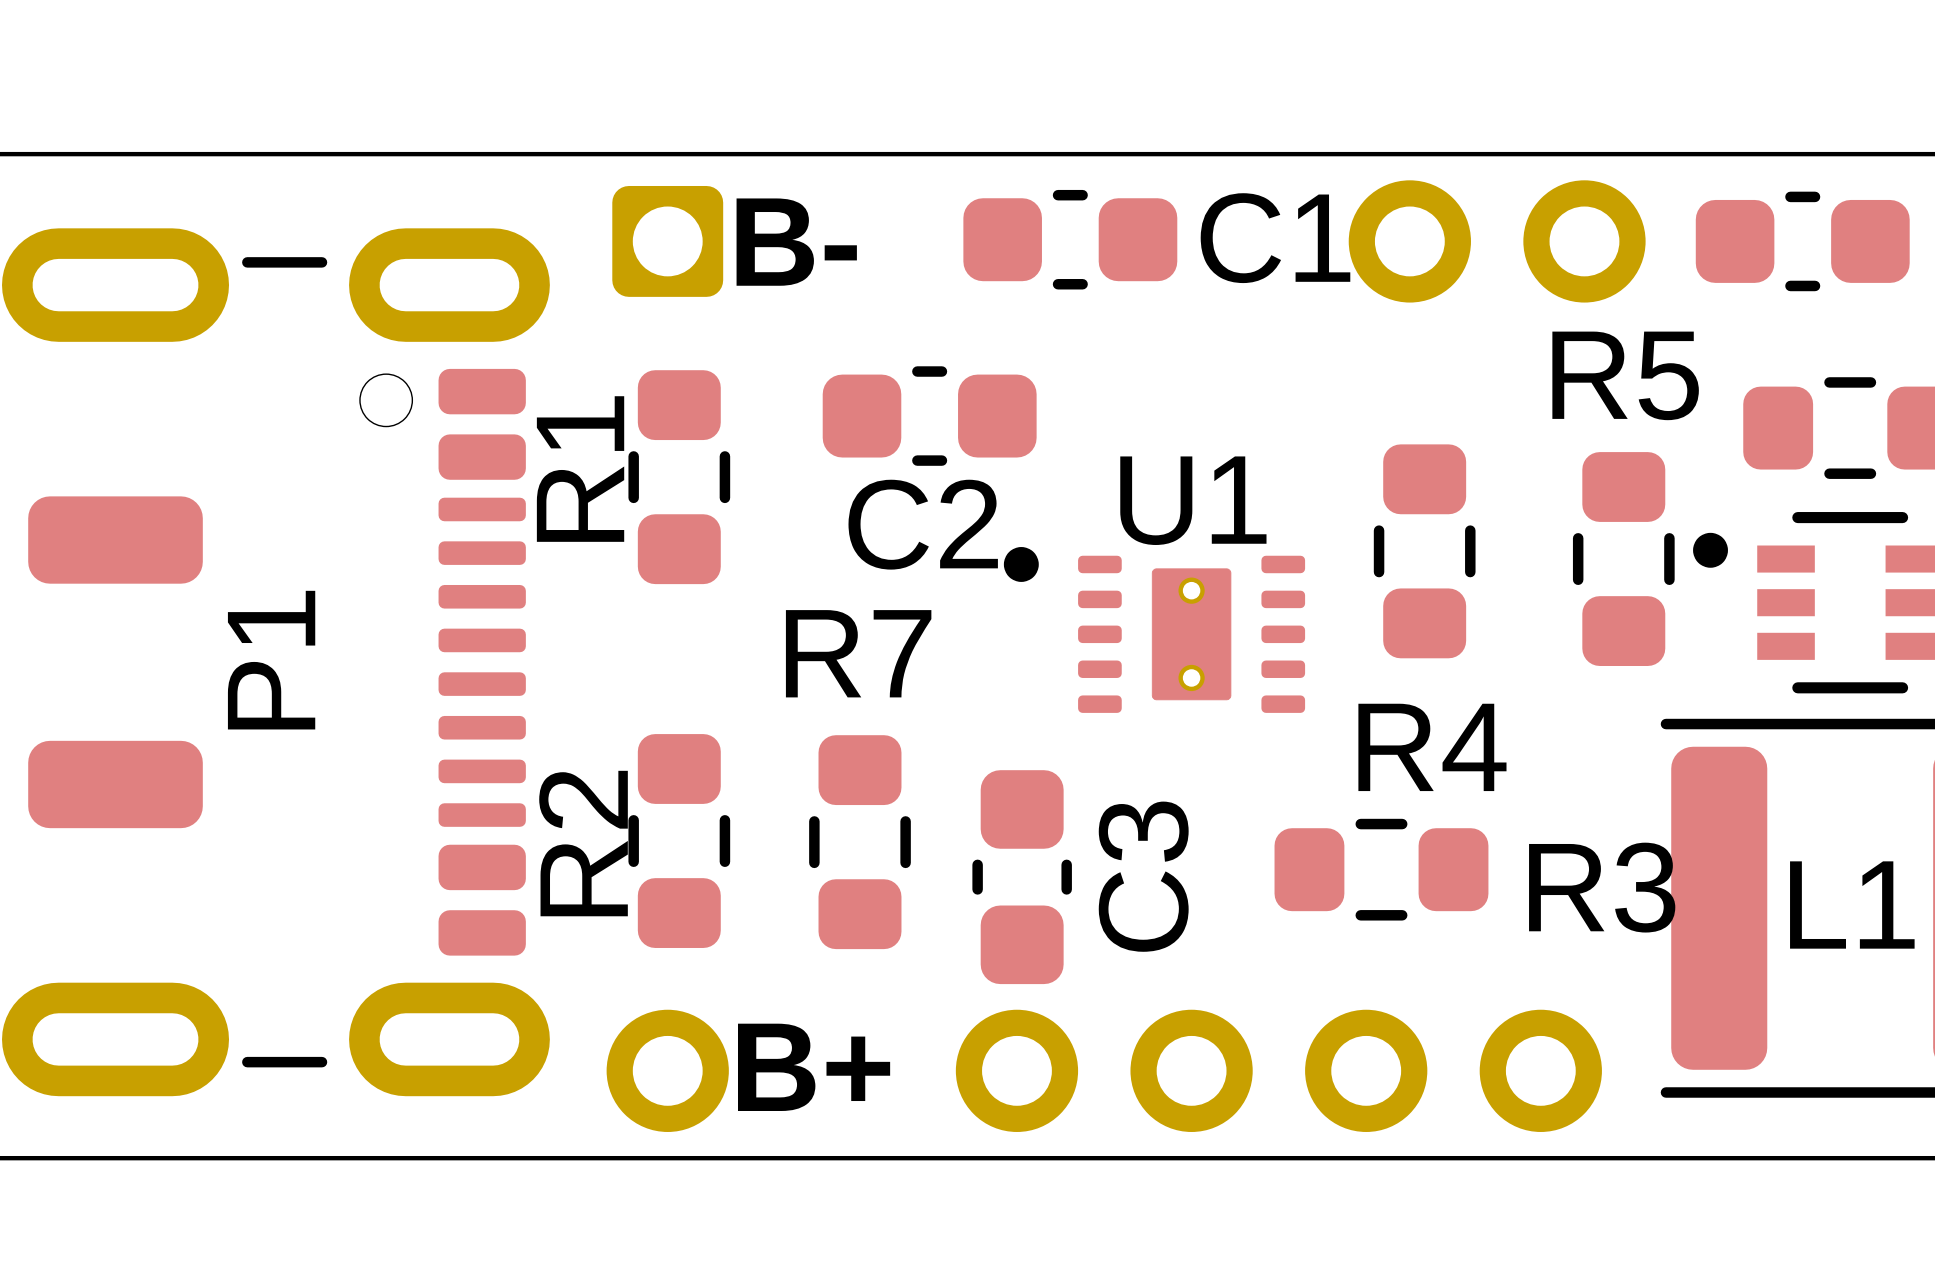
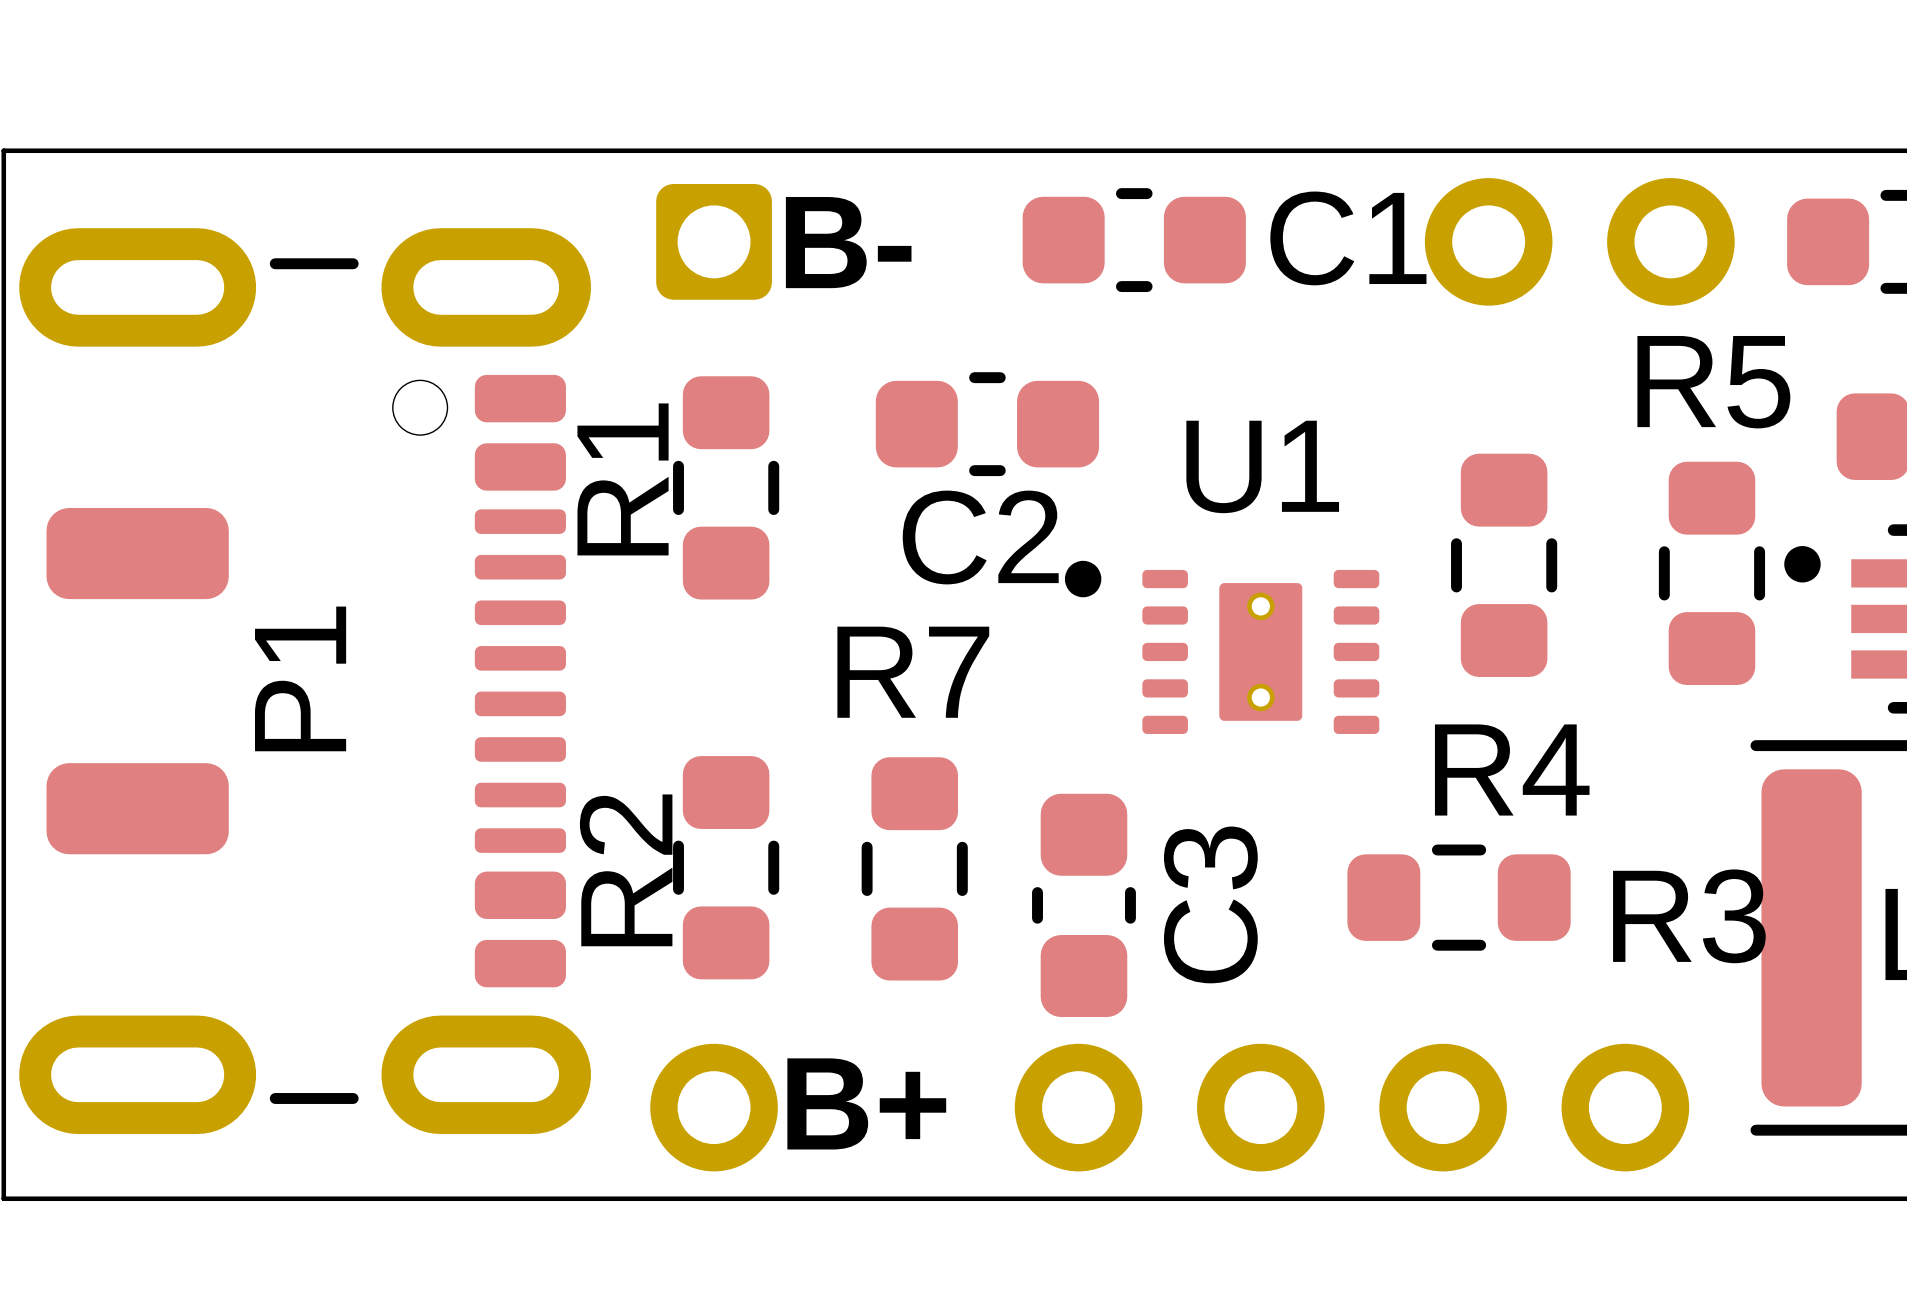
U1 name position: U1 (1193, 500) -> U1 (1262, 466)

